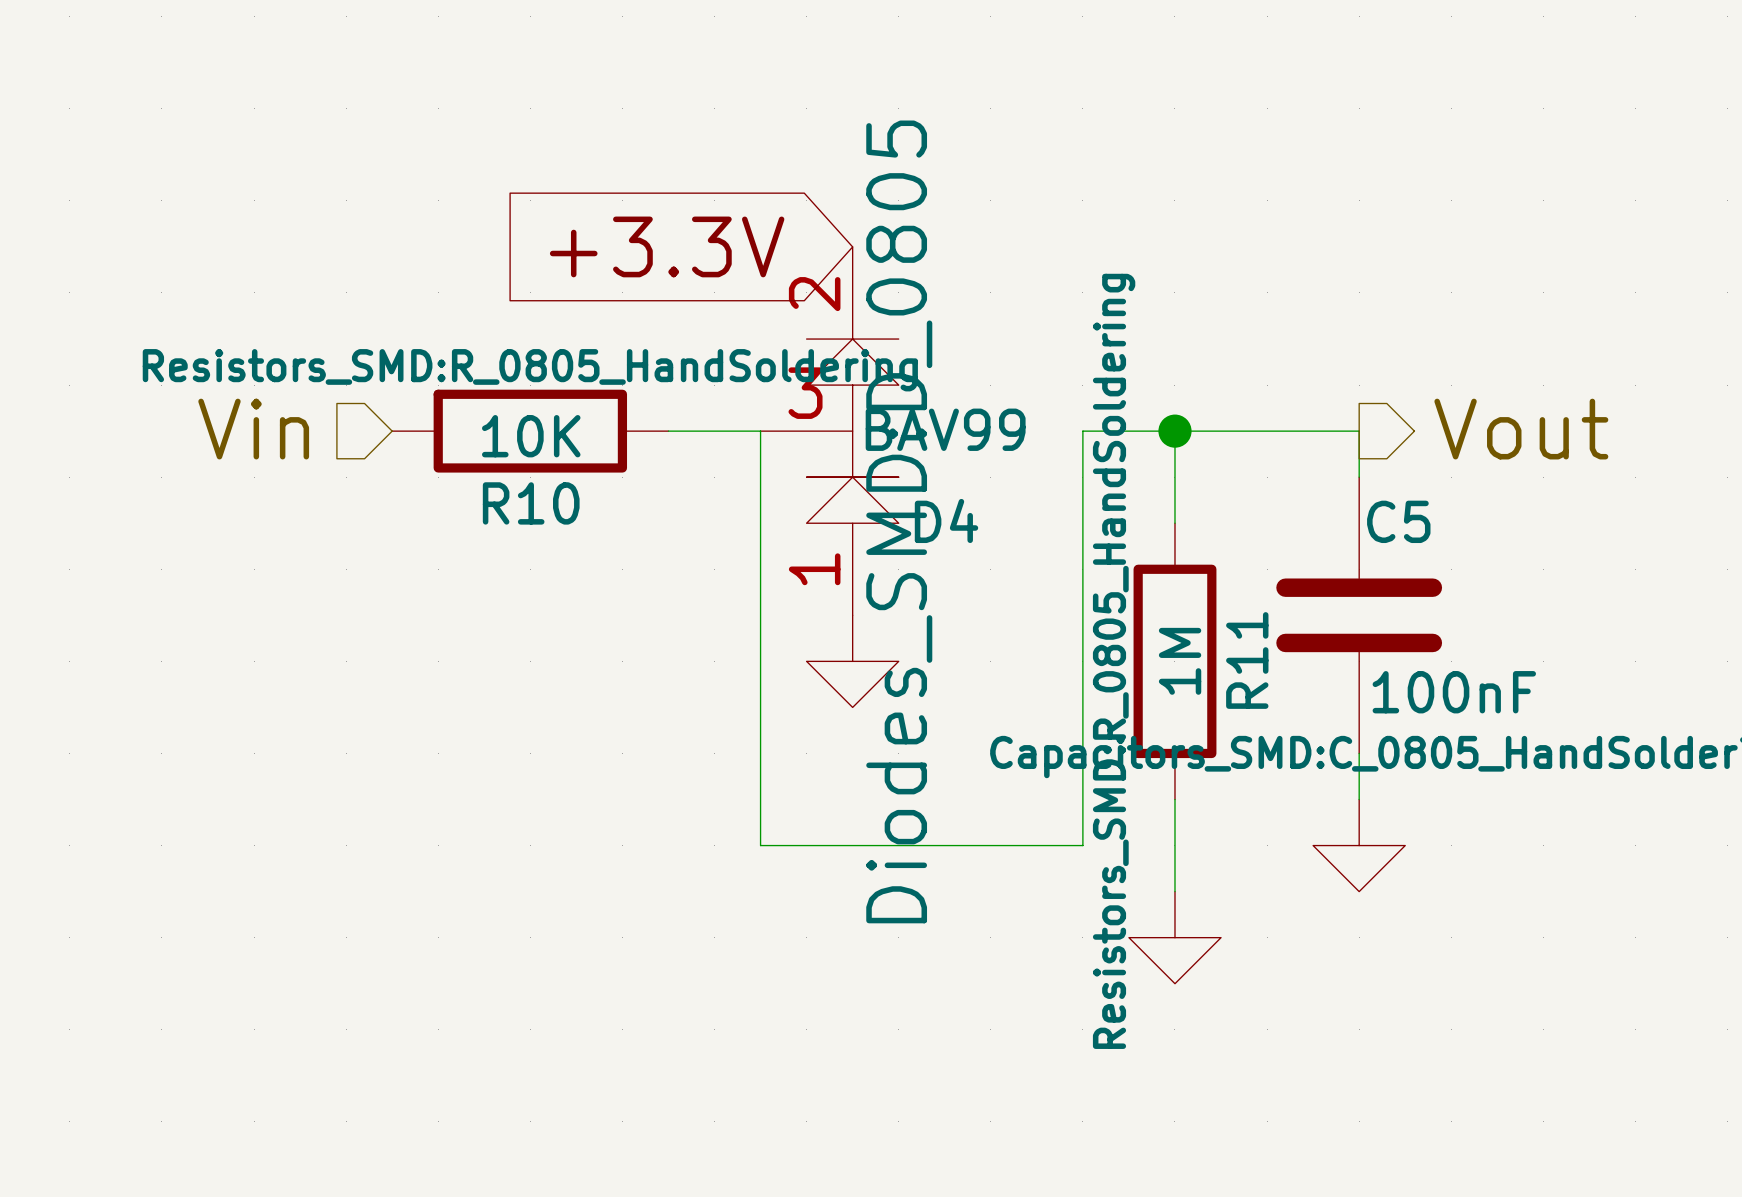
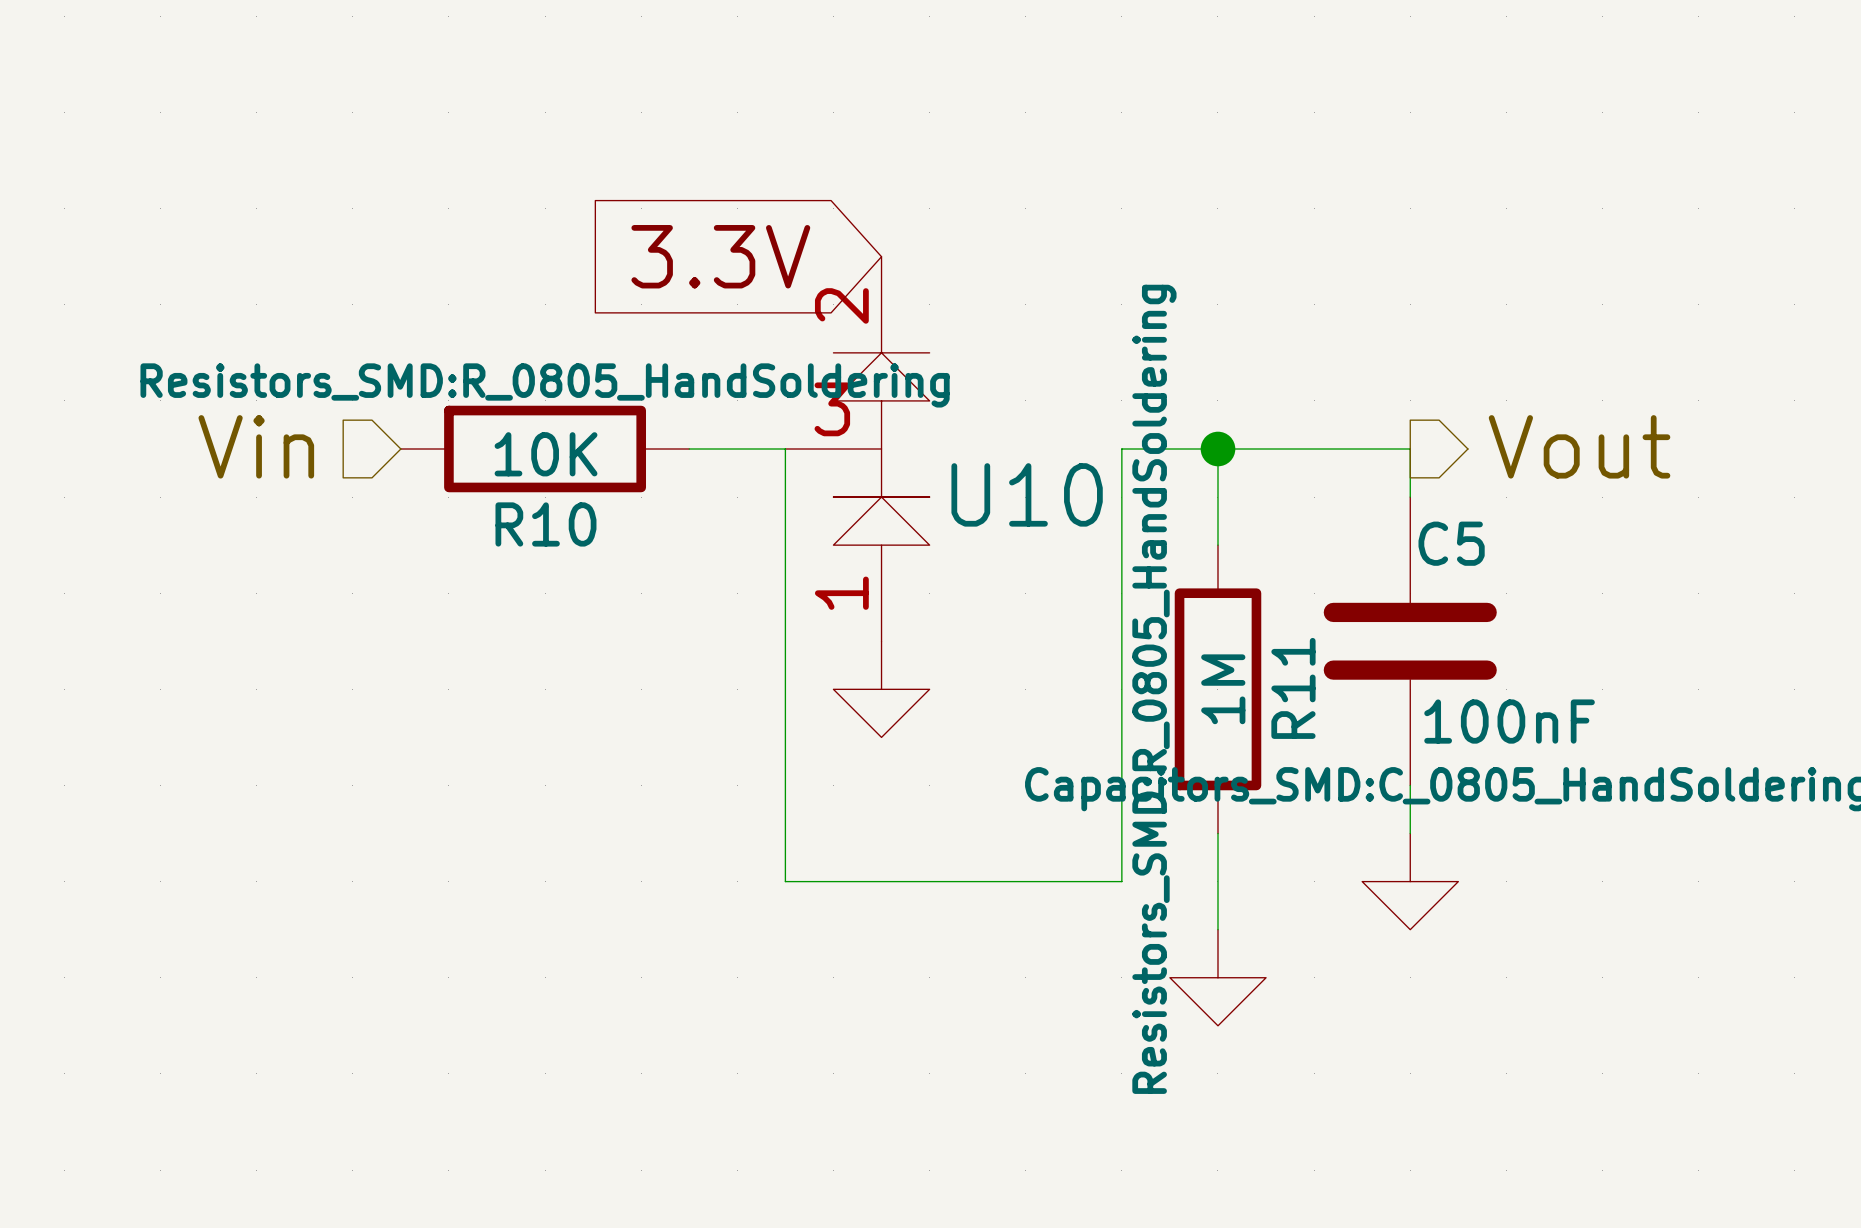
global label: +3.3V (667, 246) -> 3.3V (720, 256)
D4 value: BAV99 (945, 429) -> none
D4 name: D4 (946, 520) -> U10 (1027, 494)
D4 text: Diodes_SMD:D_0805 (899, 521) -> none

